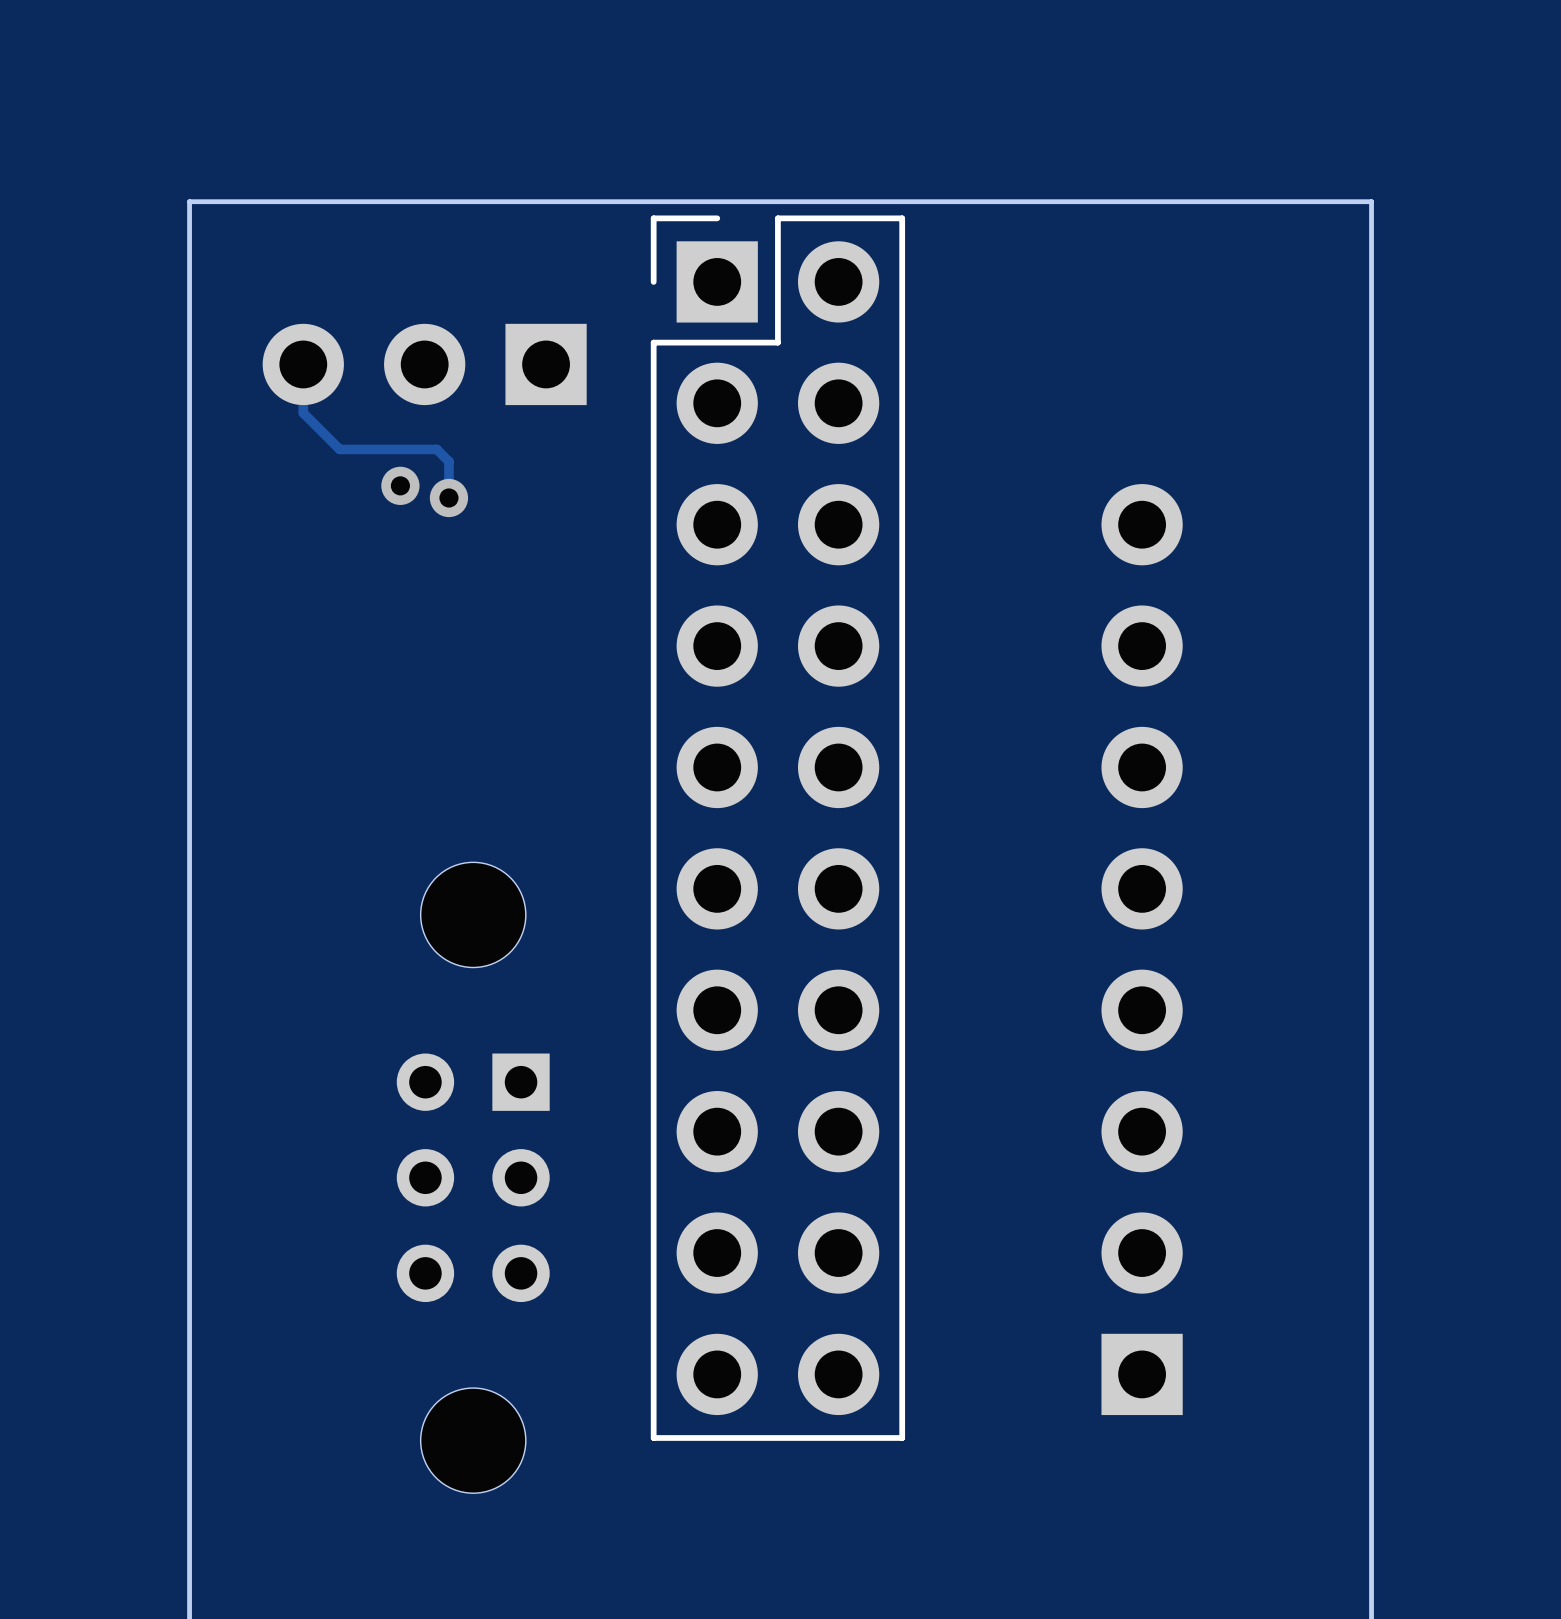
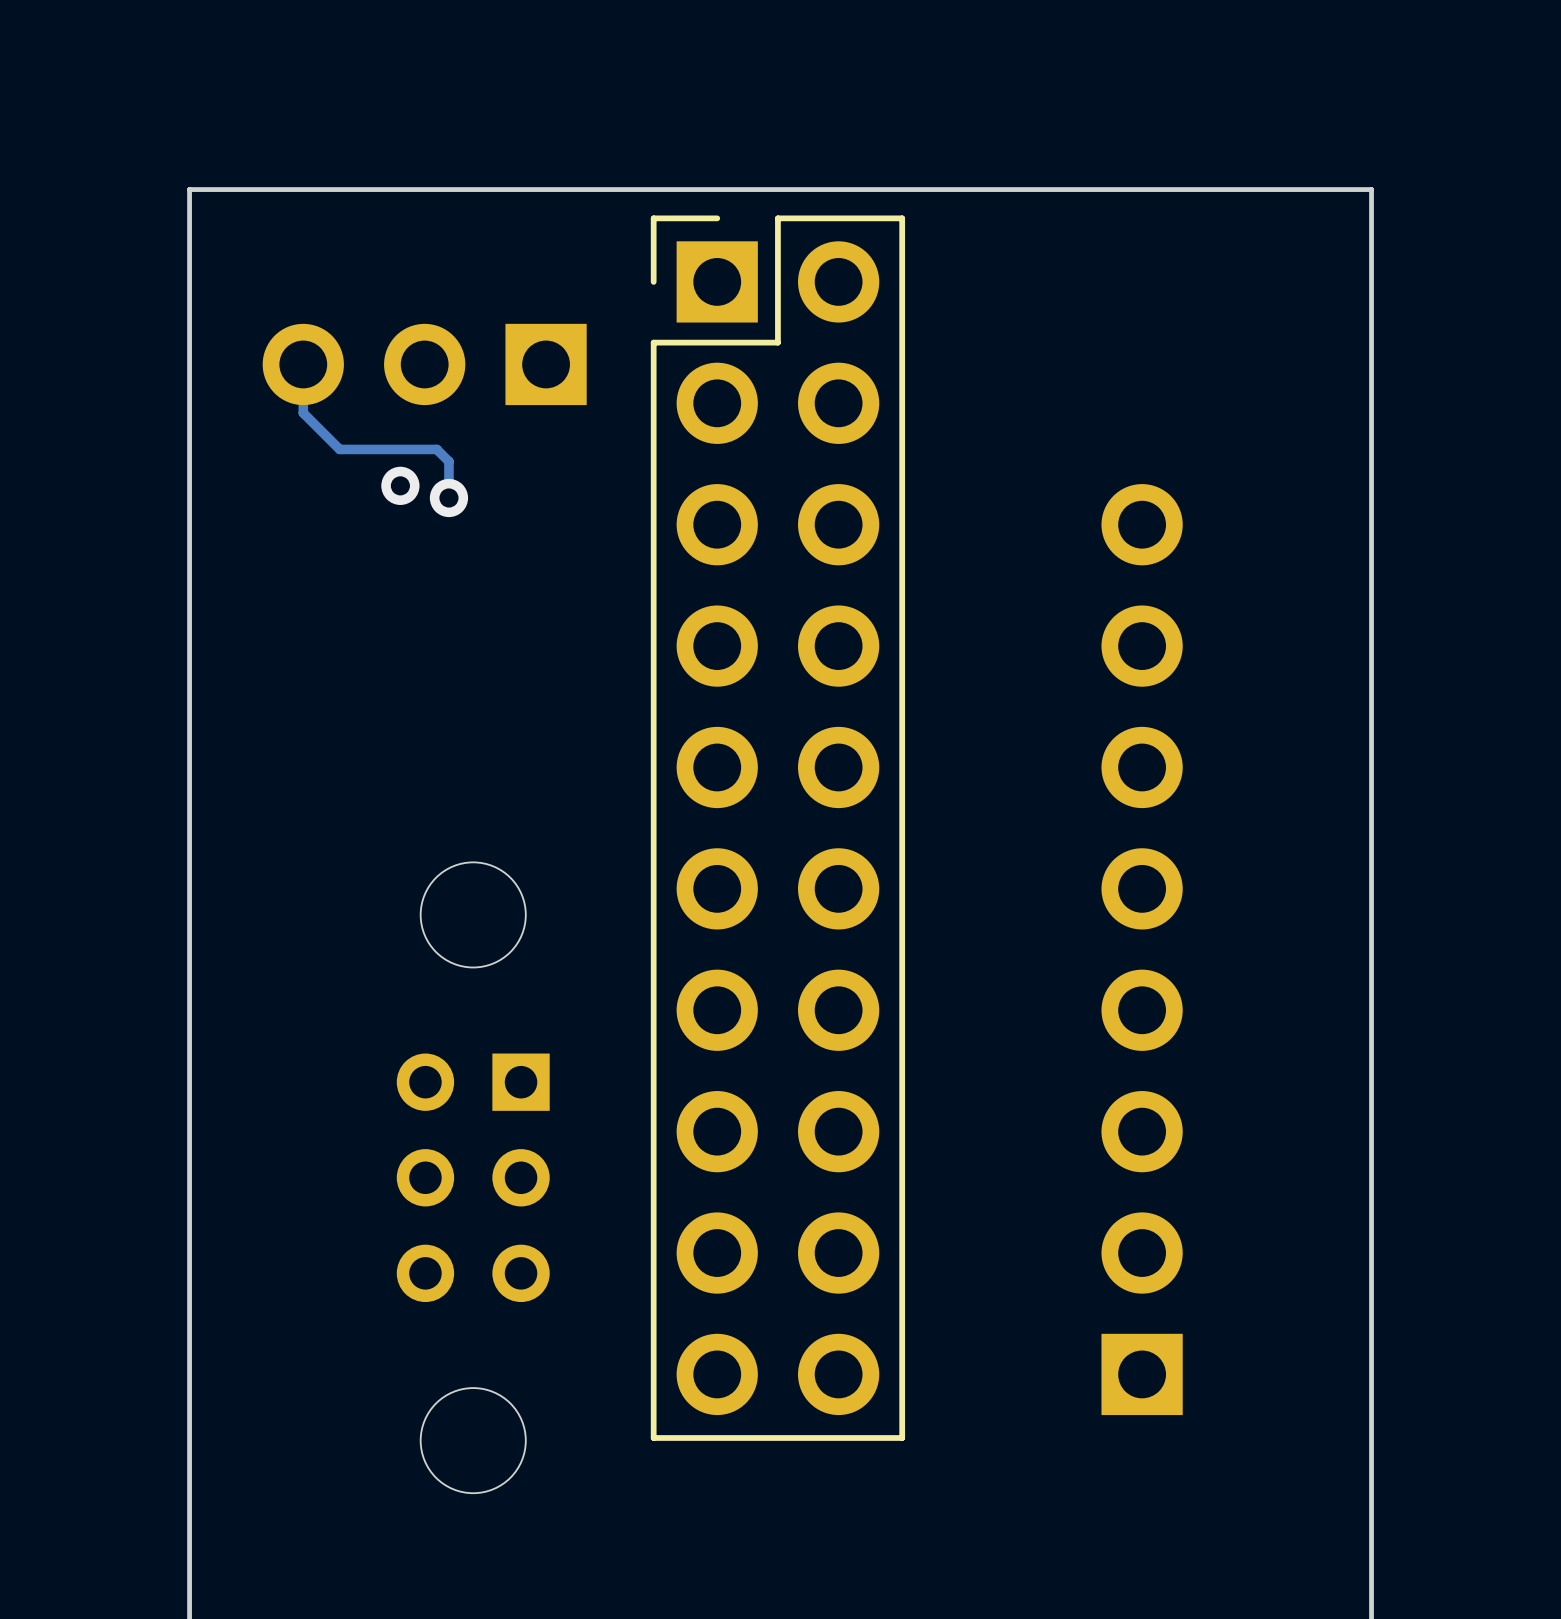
board edge: (1371, 201) (189, 201) -> (1371, 201) (1371, 189) (189, 189) (189, 201)

